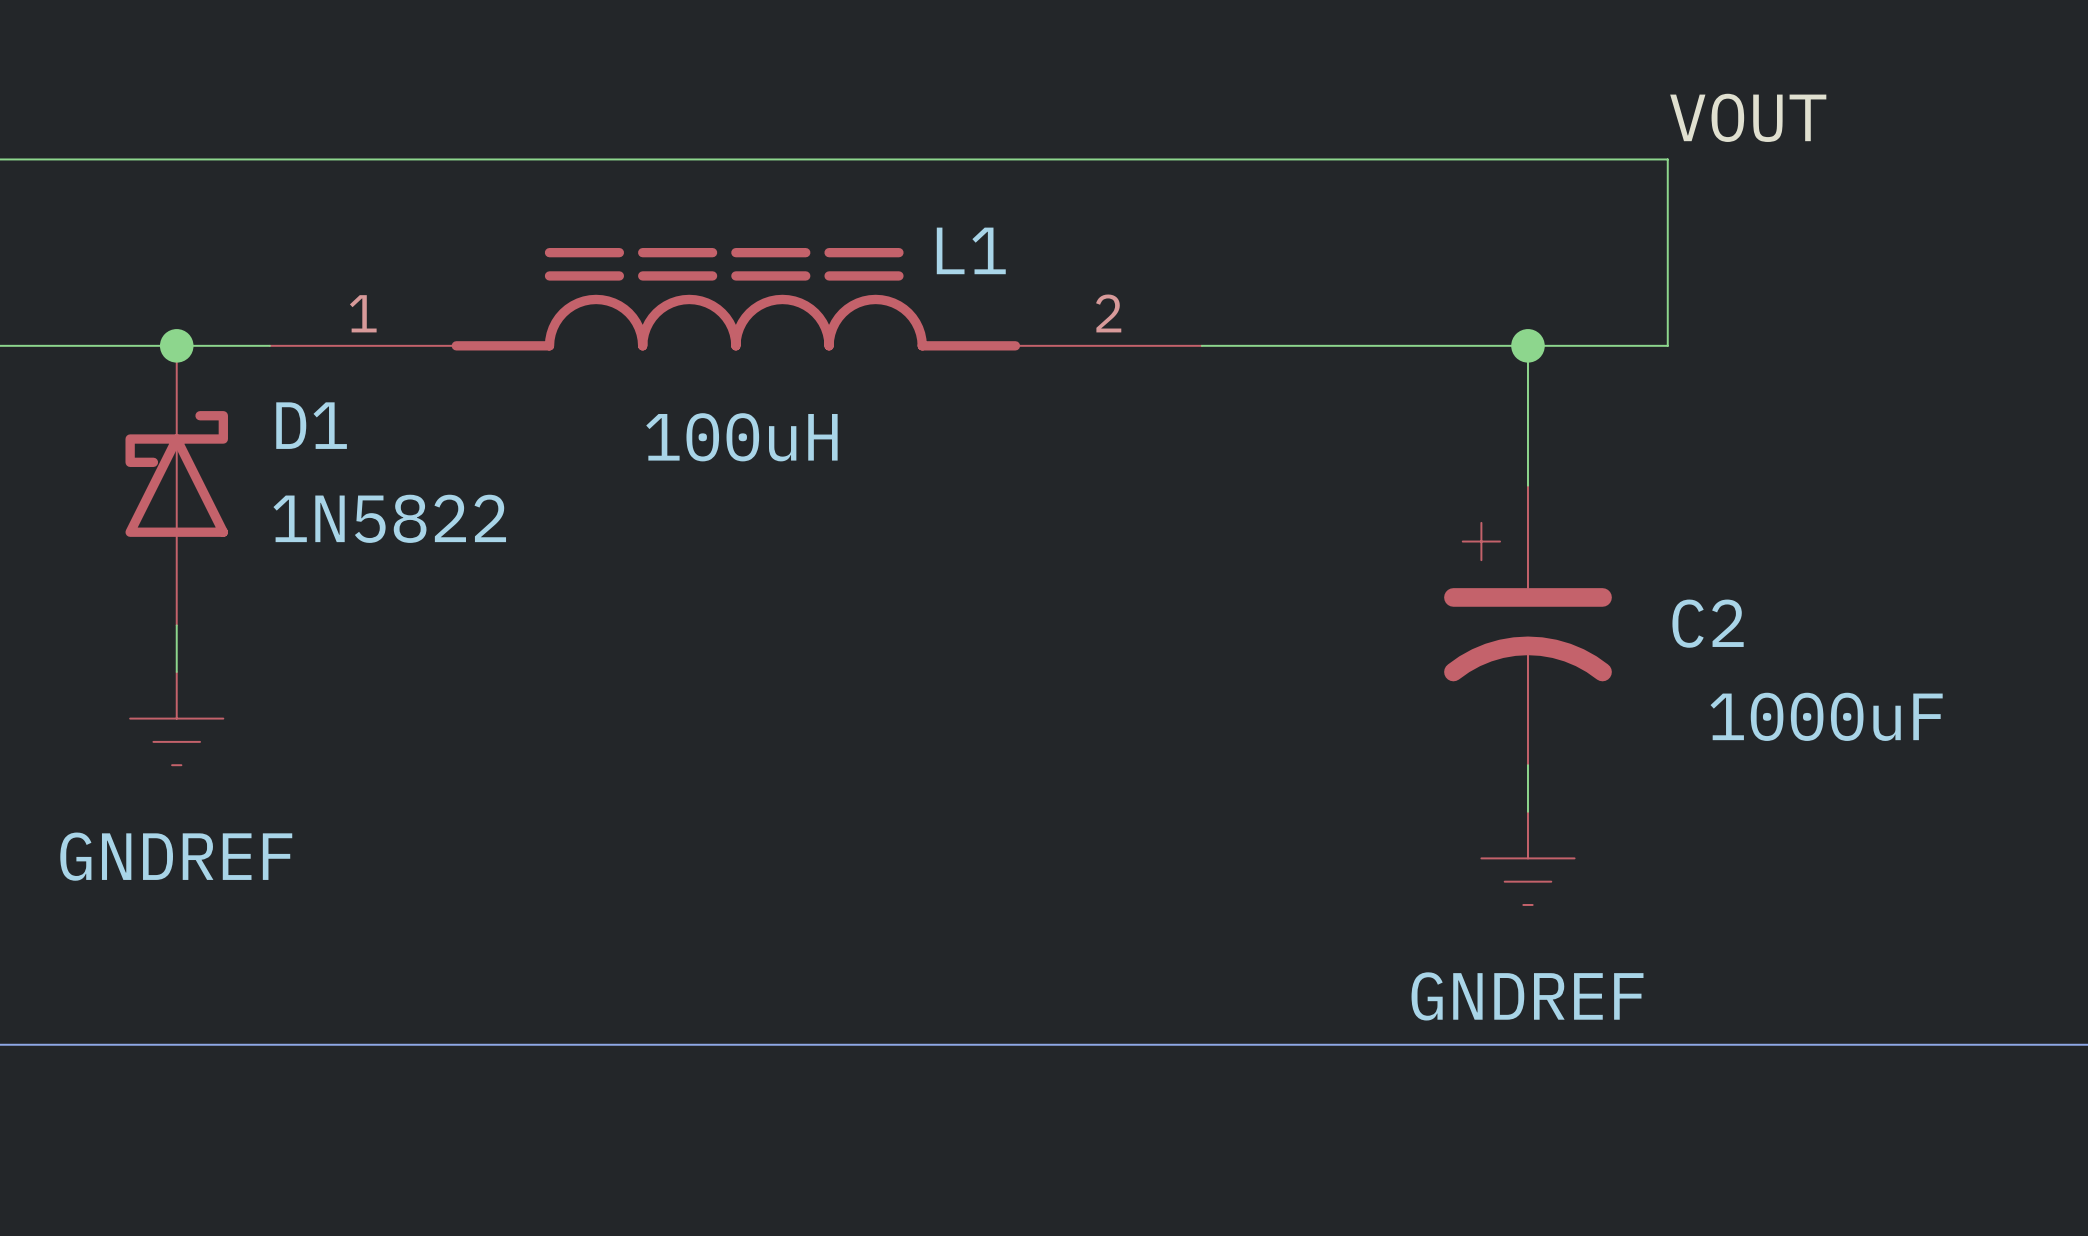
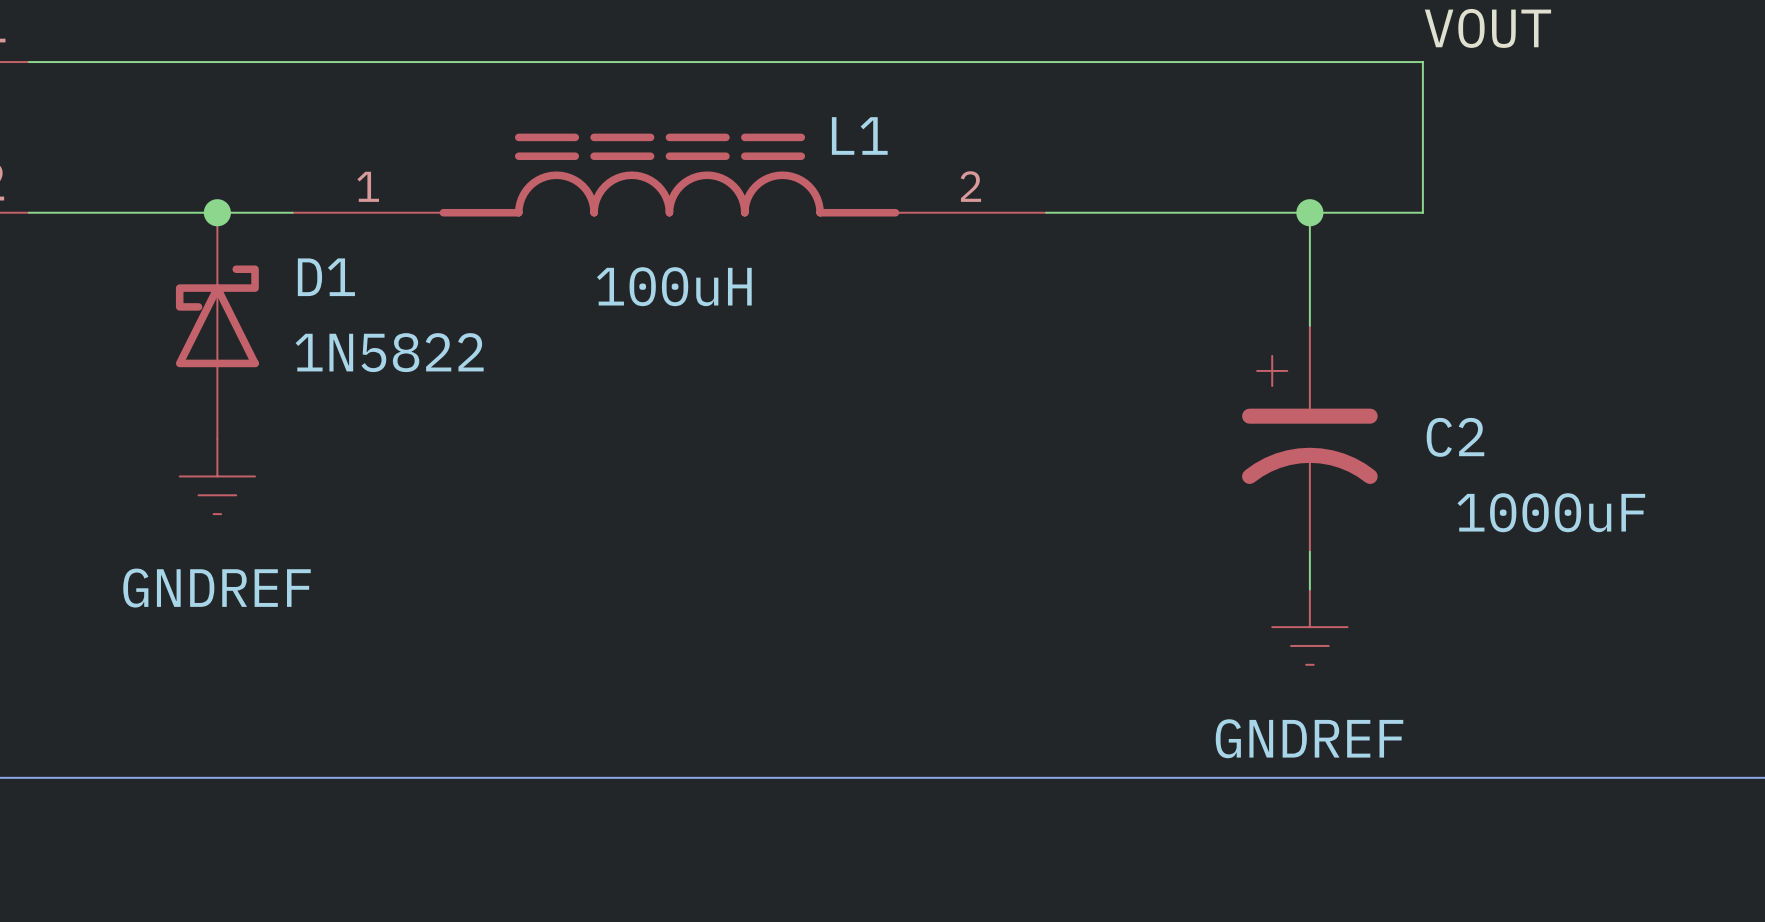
power symbol position: GNDREF (176, 718) -> GNDREF (217, 476)

